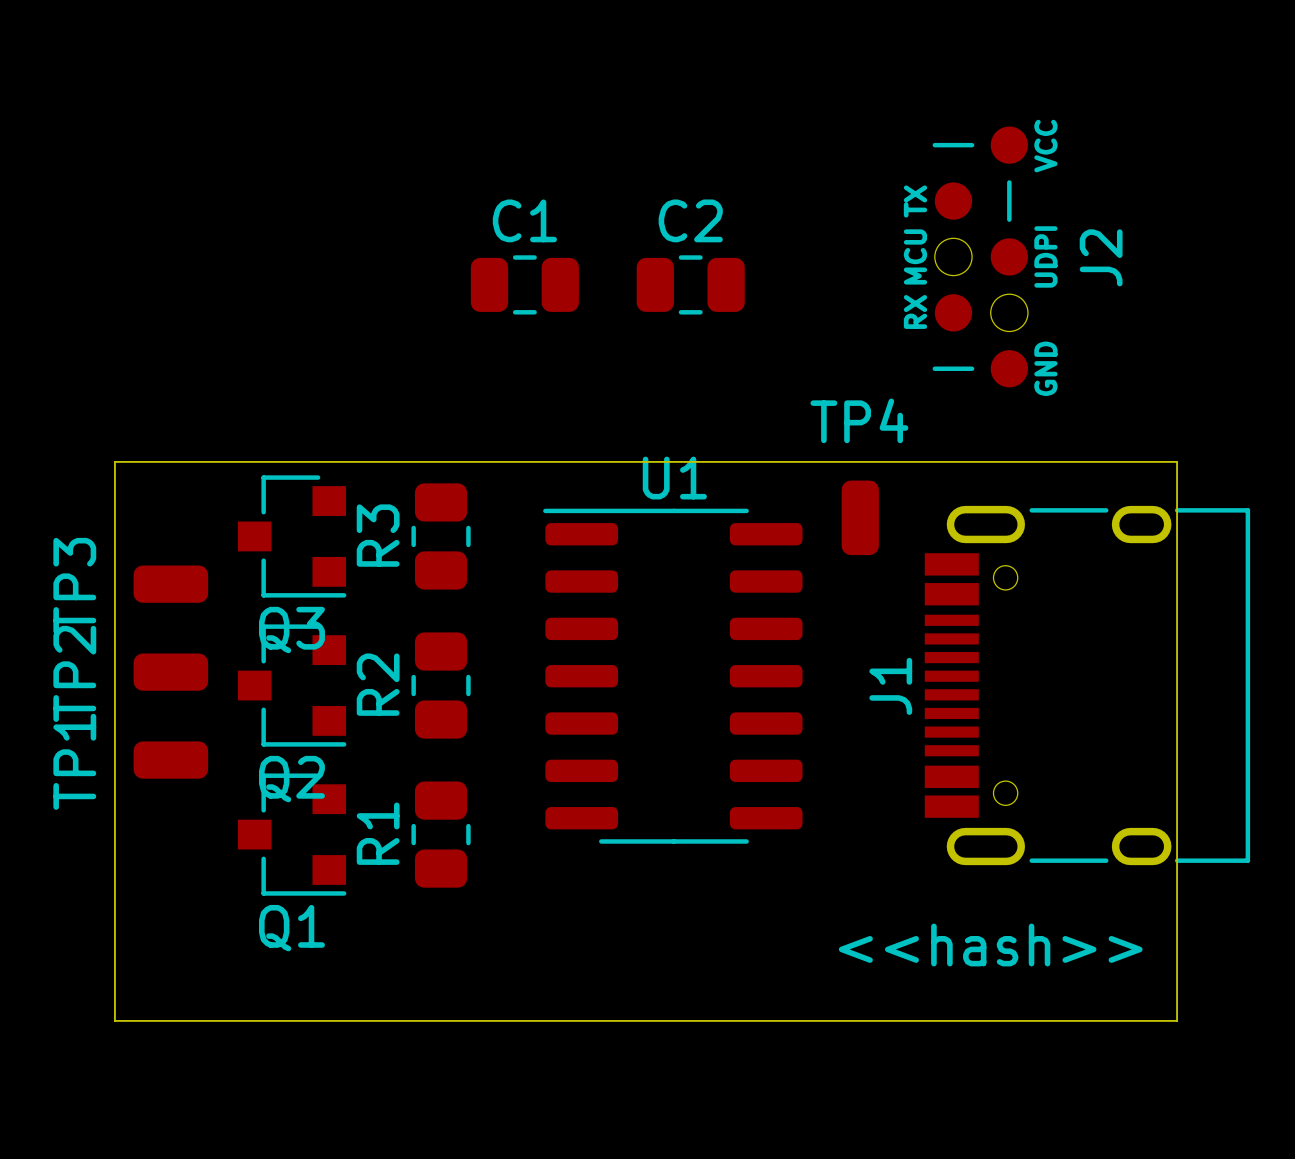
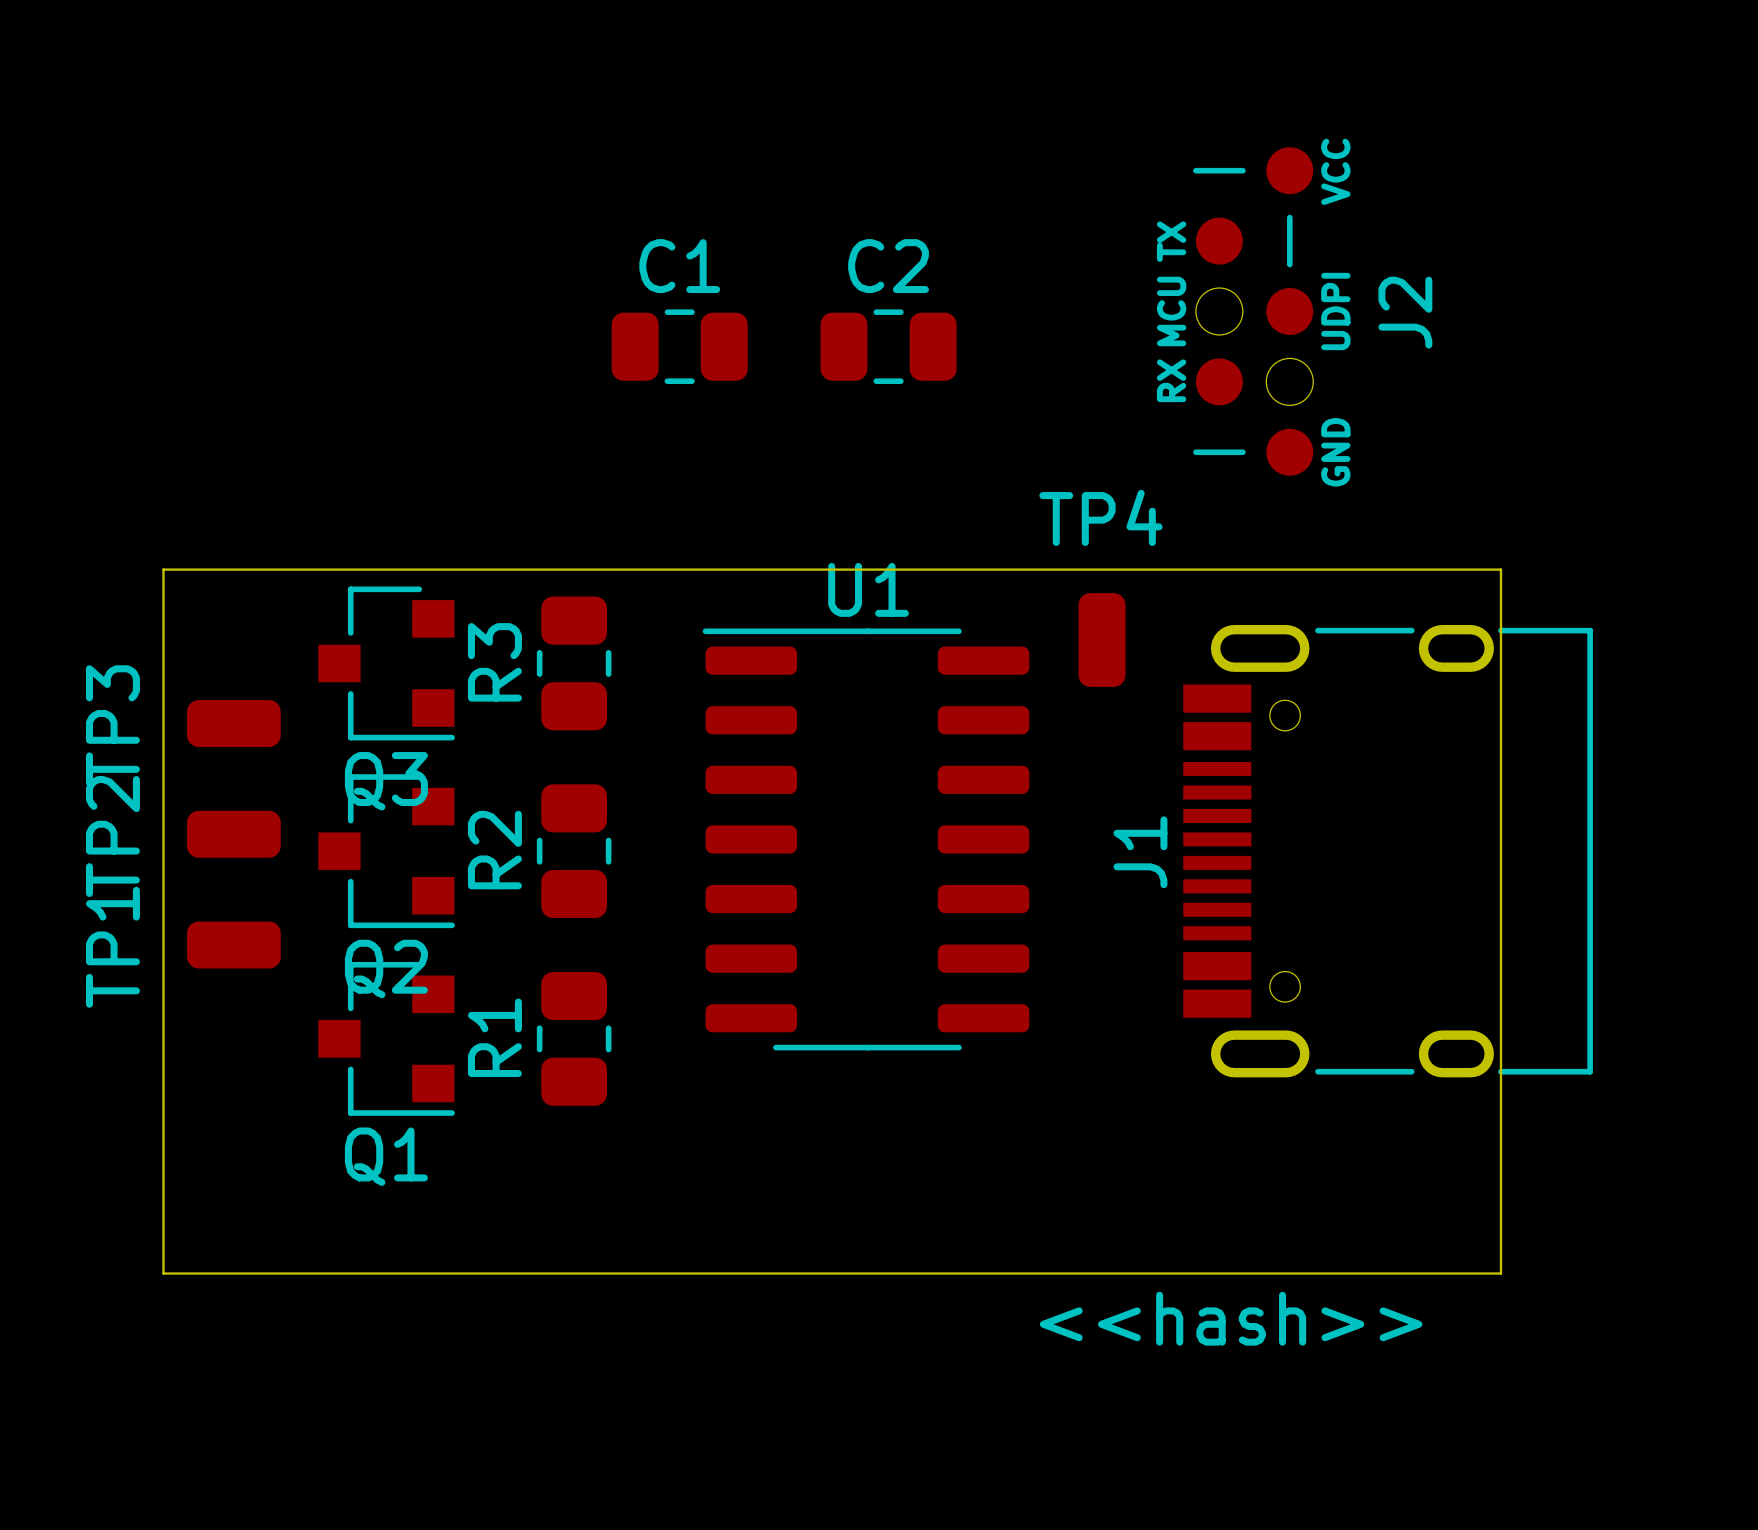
text position: <<hash>> (990, 944) -> <<hash>> (1231, 1318)

